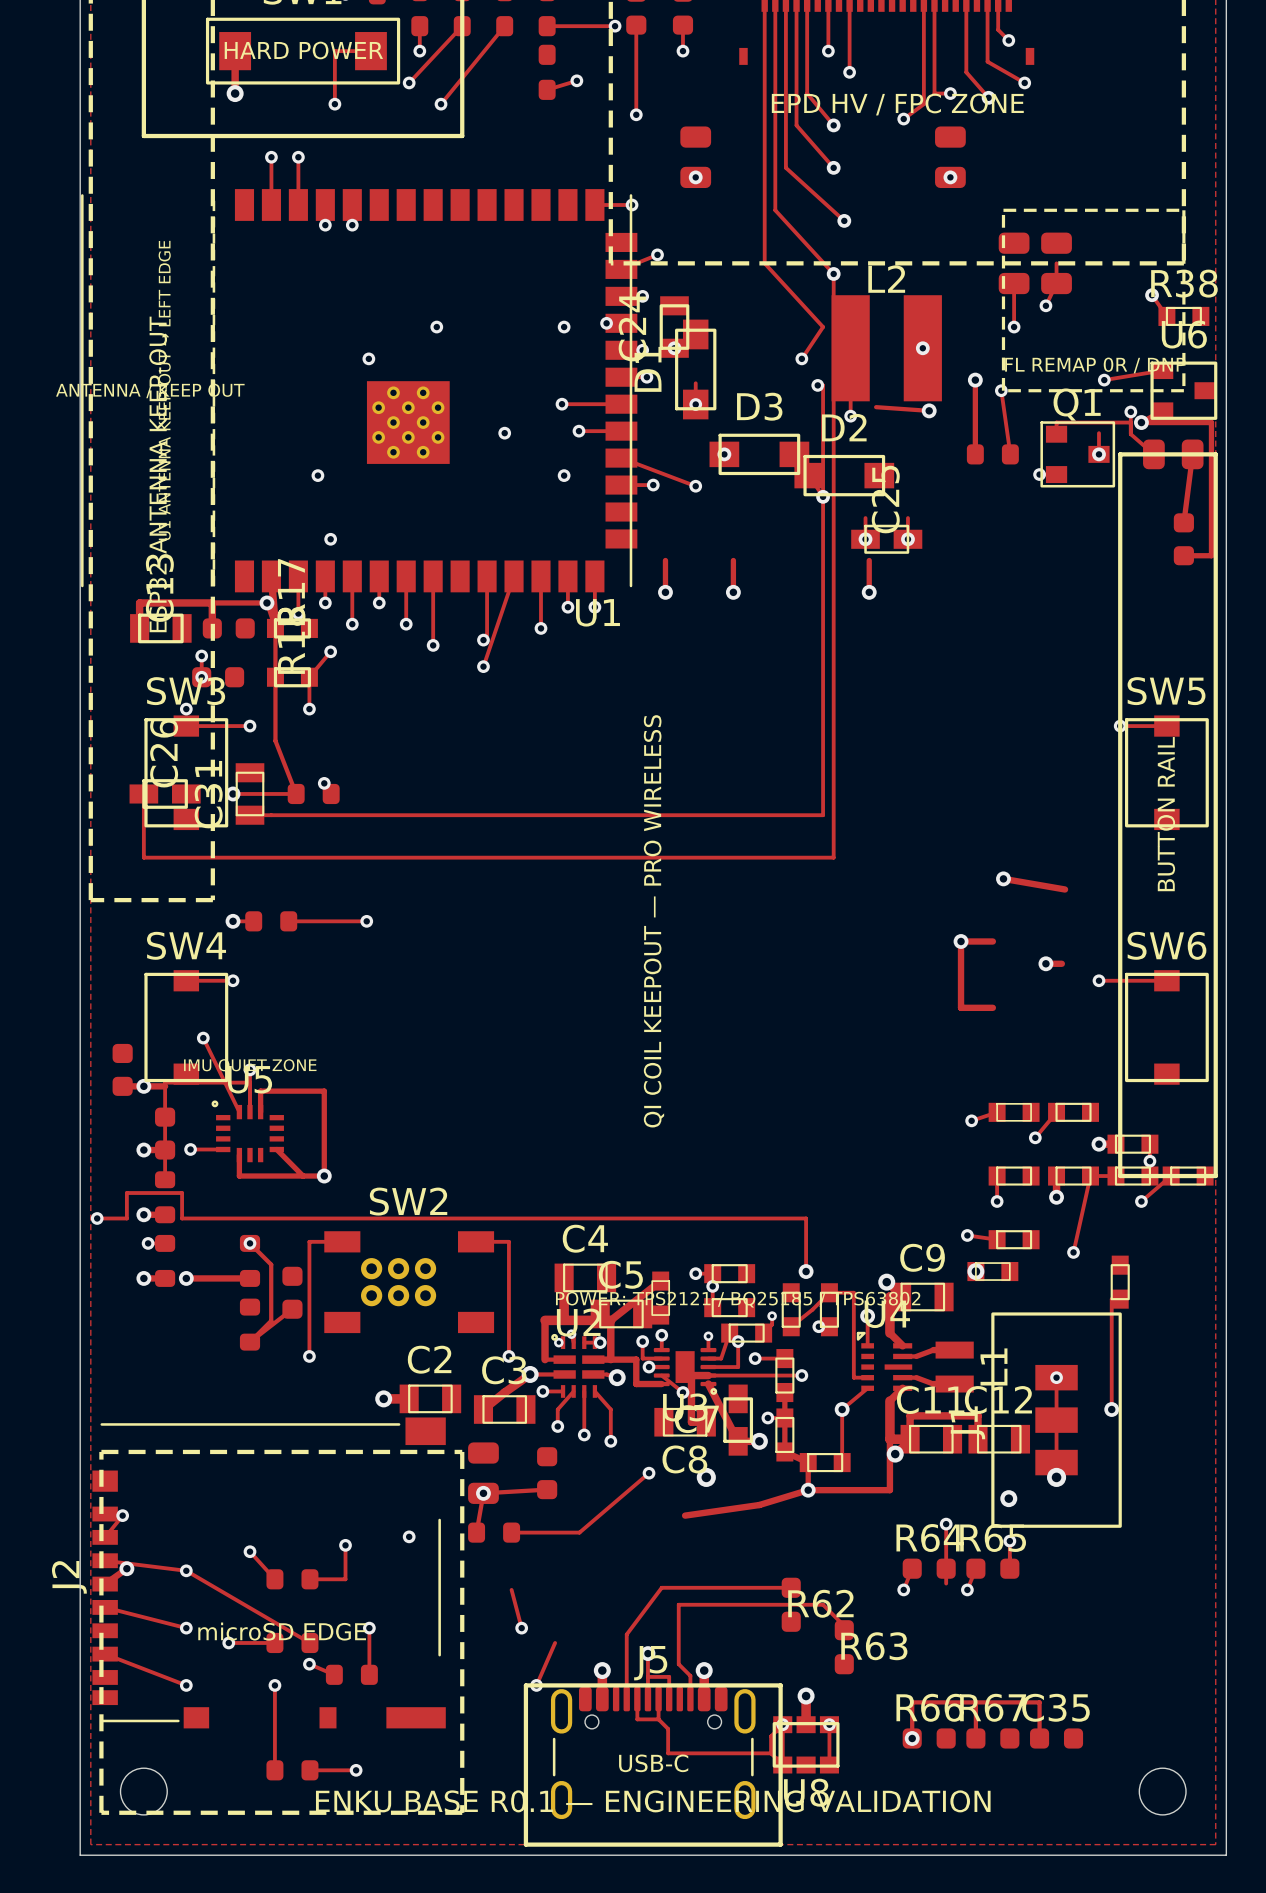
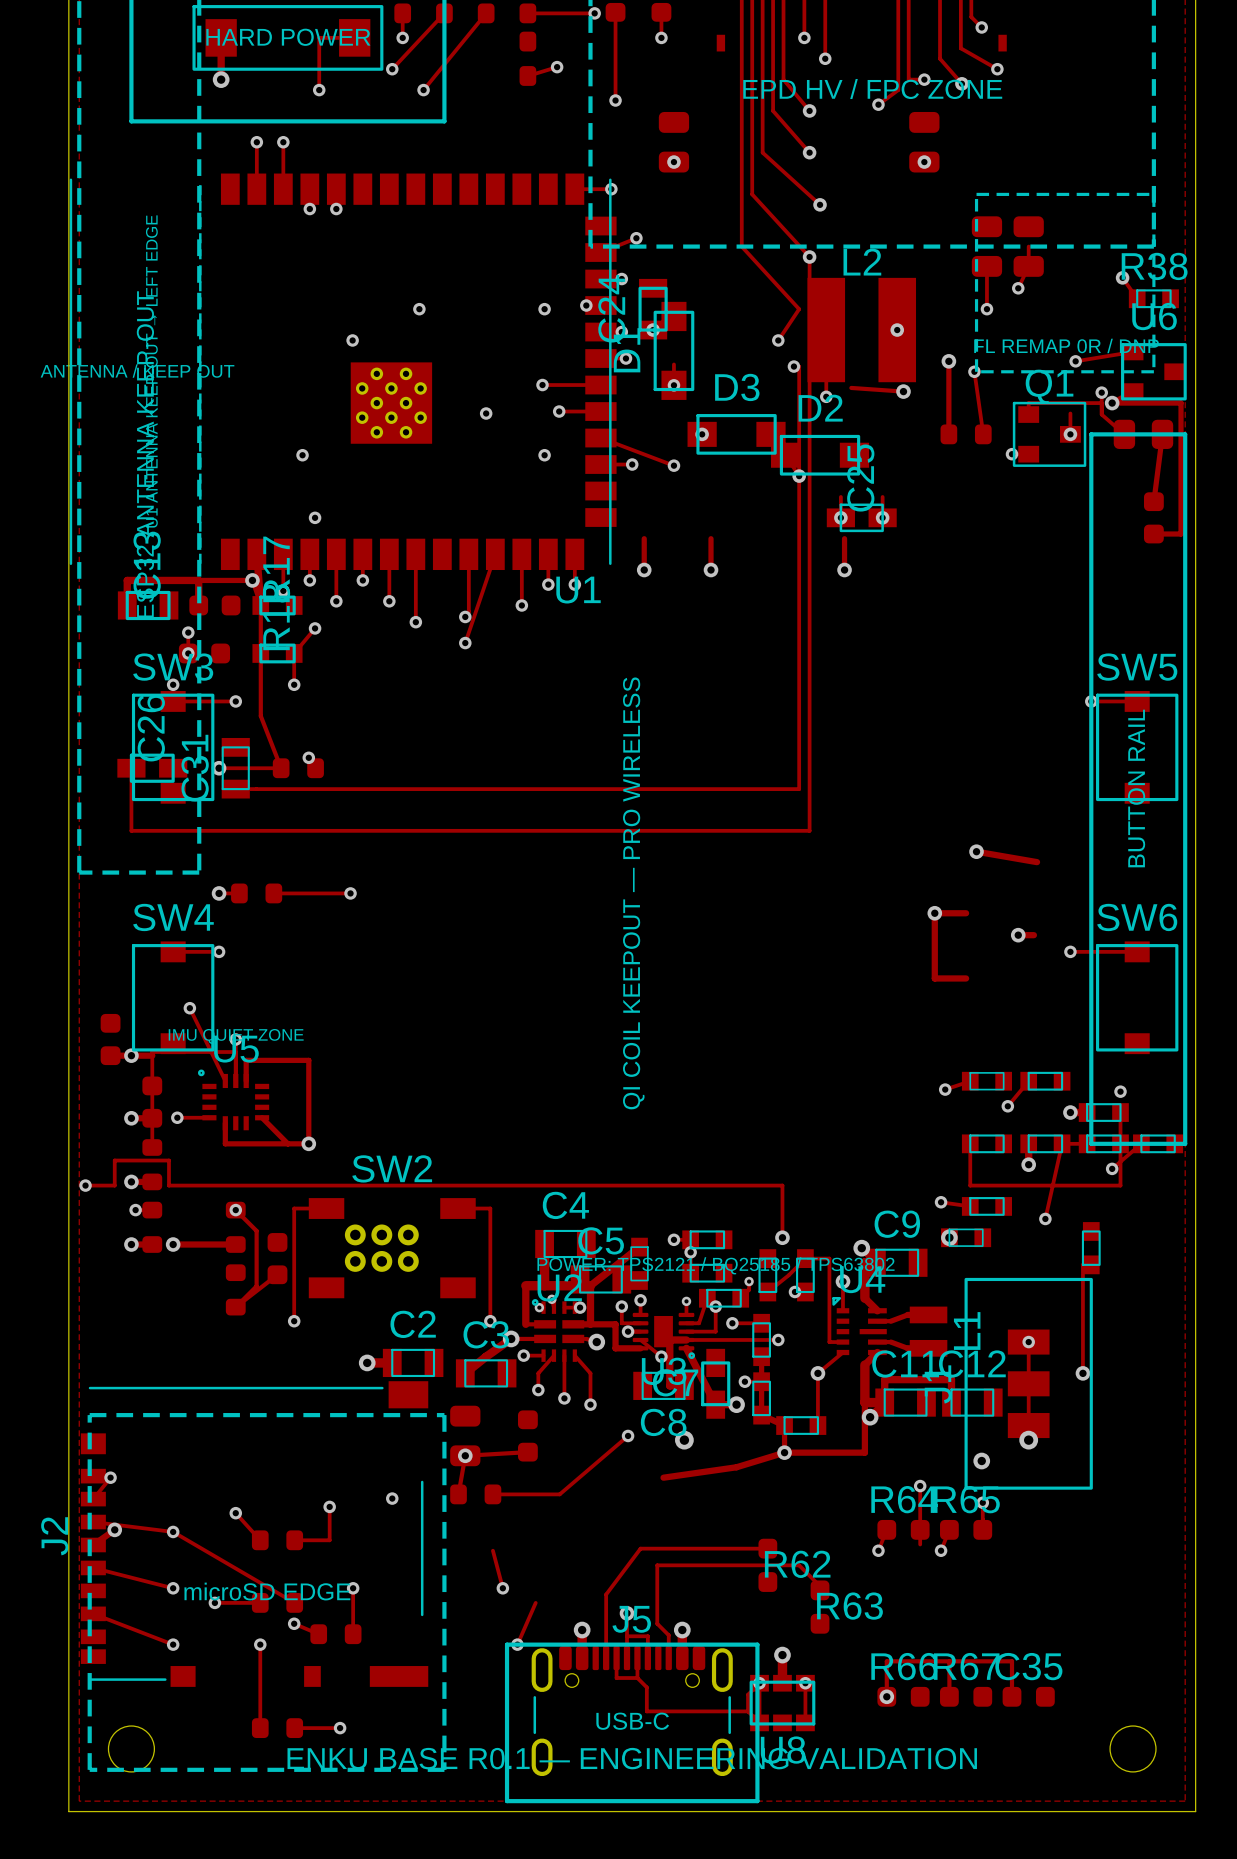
track: none -> (1120, 1129) (1120, 1185) (970, 1185) (970, 1168)
via position: (1149, 1161) -> (1120, 1091)
via: (997, 1201) -> none

